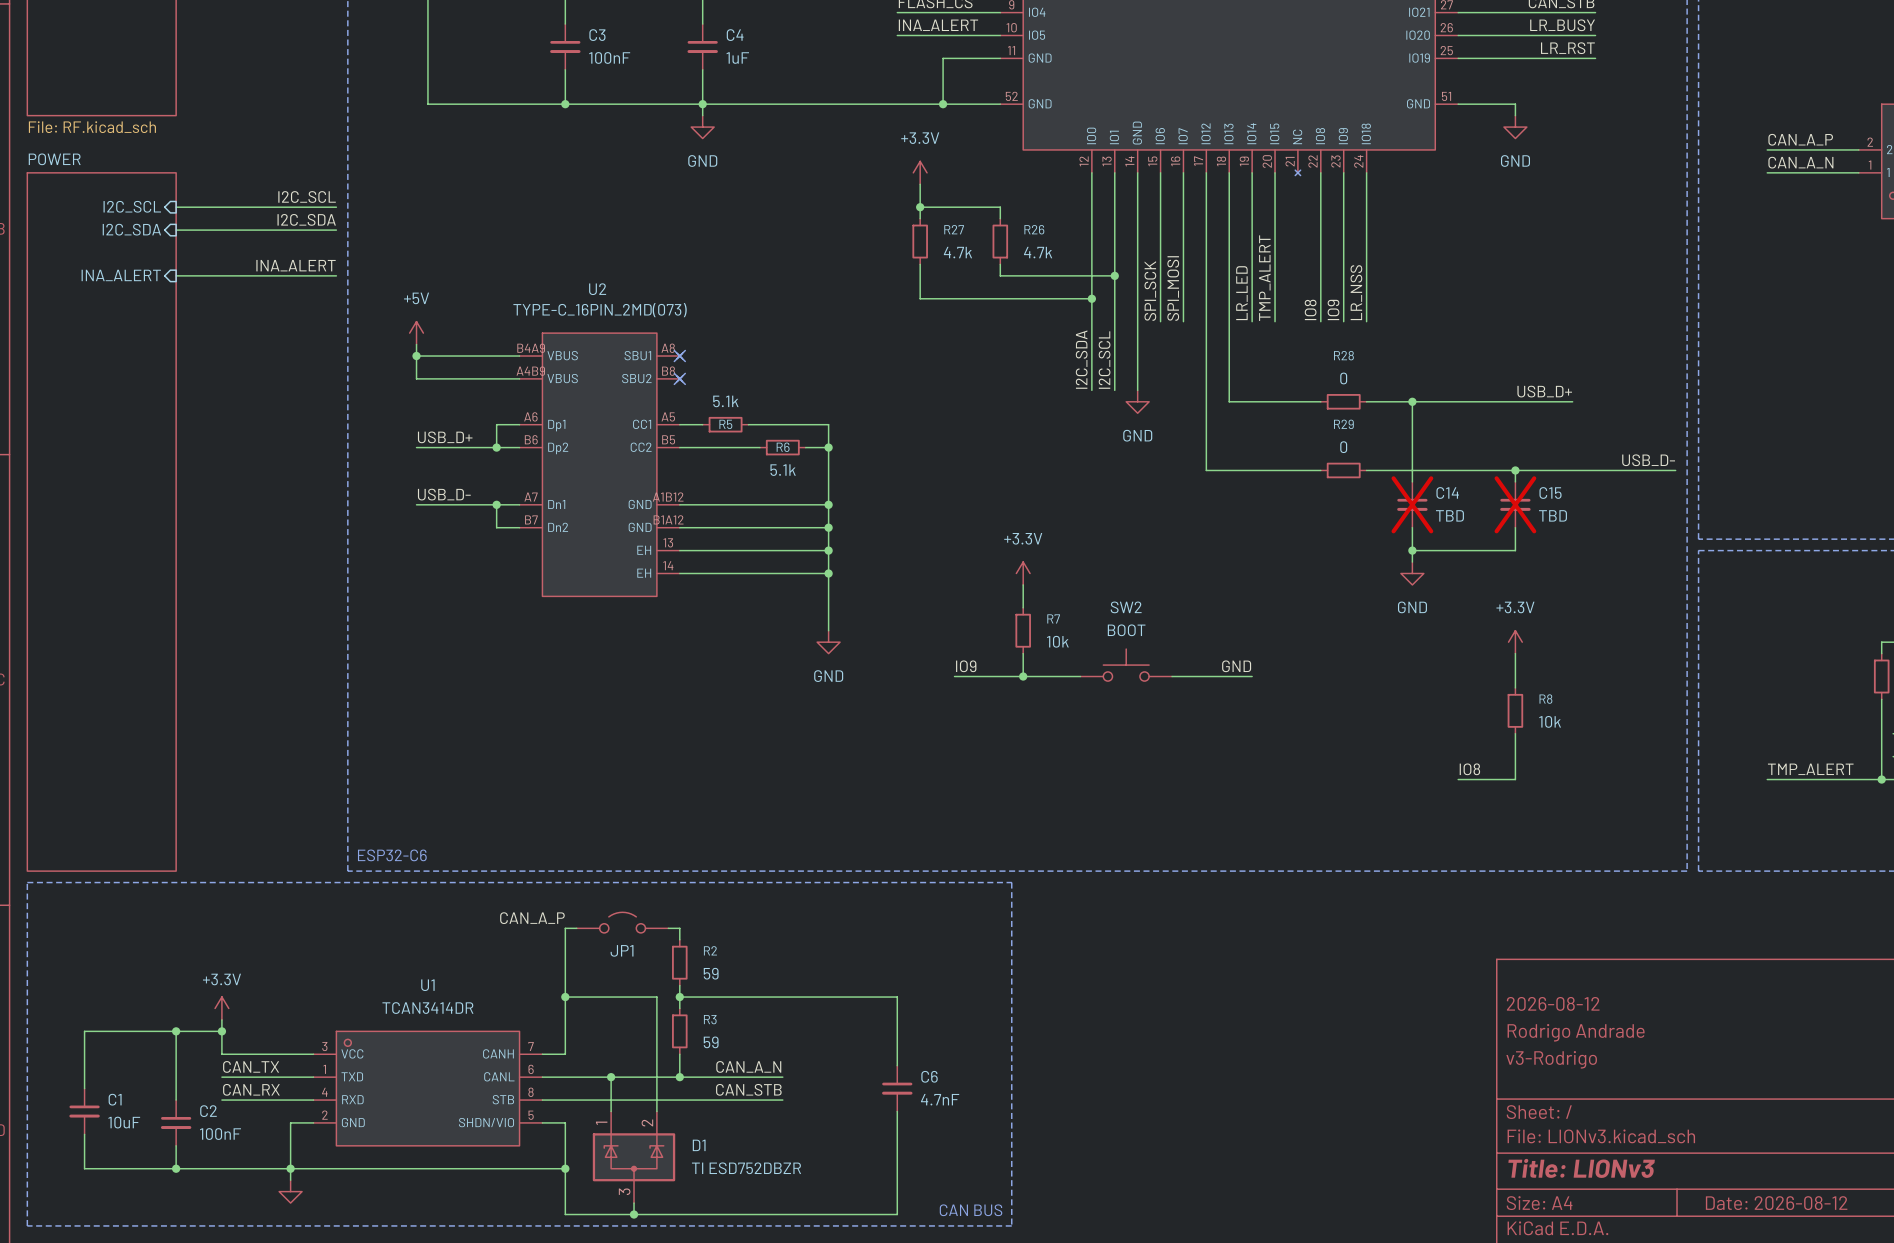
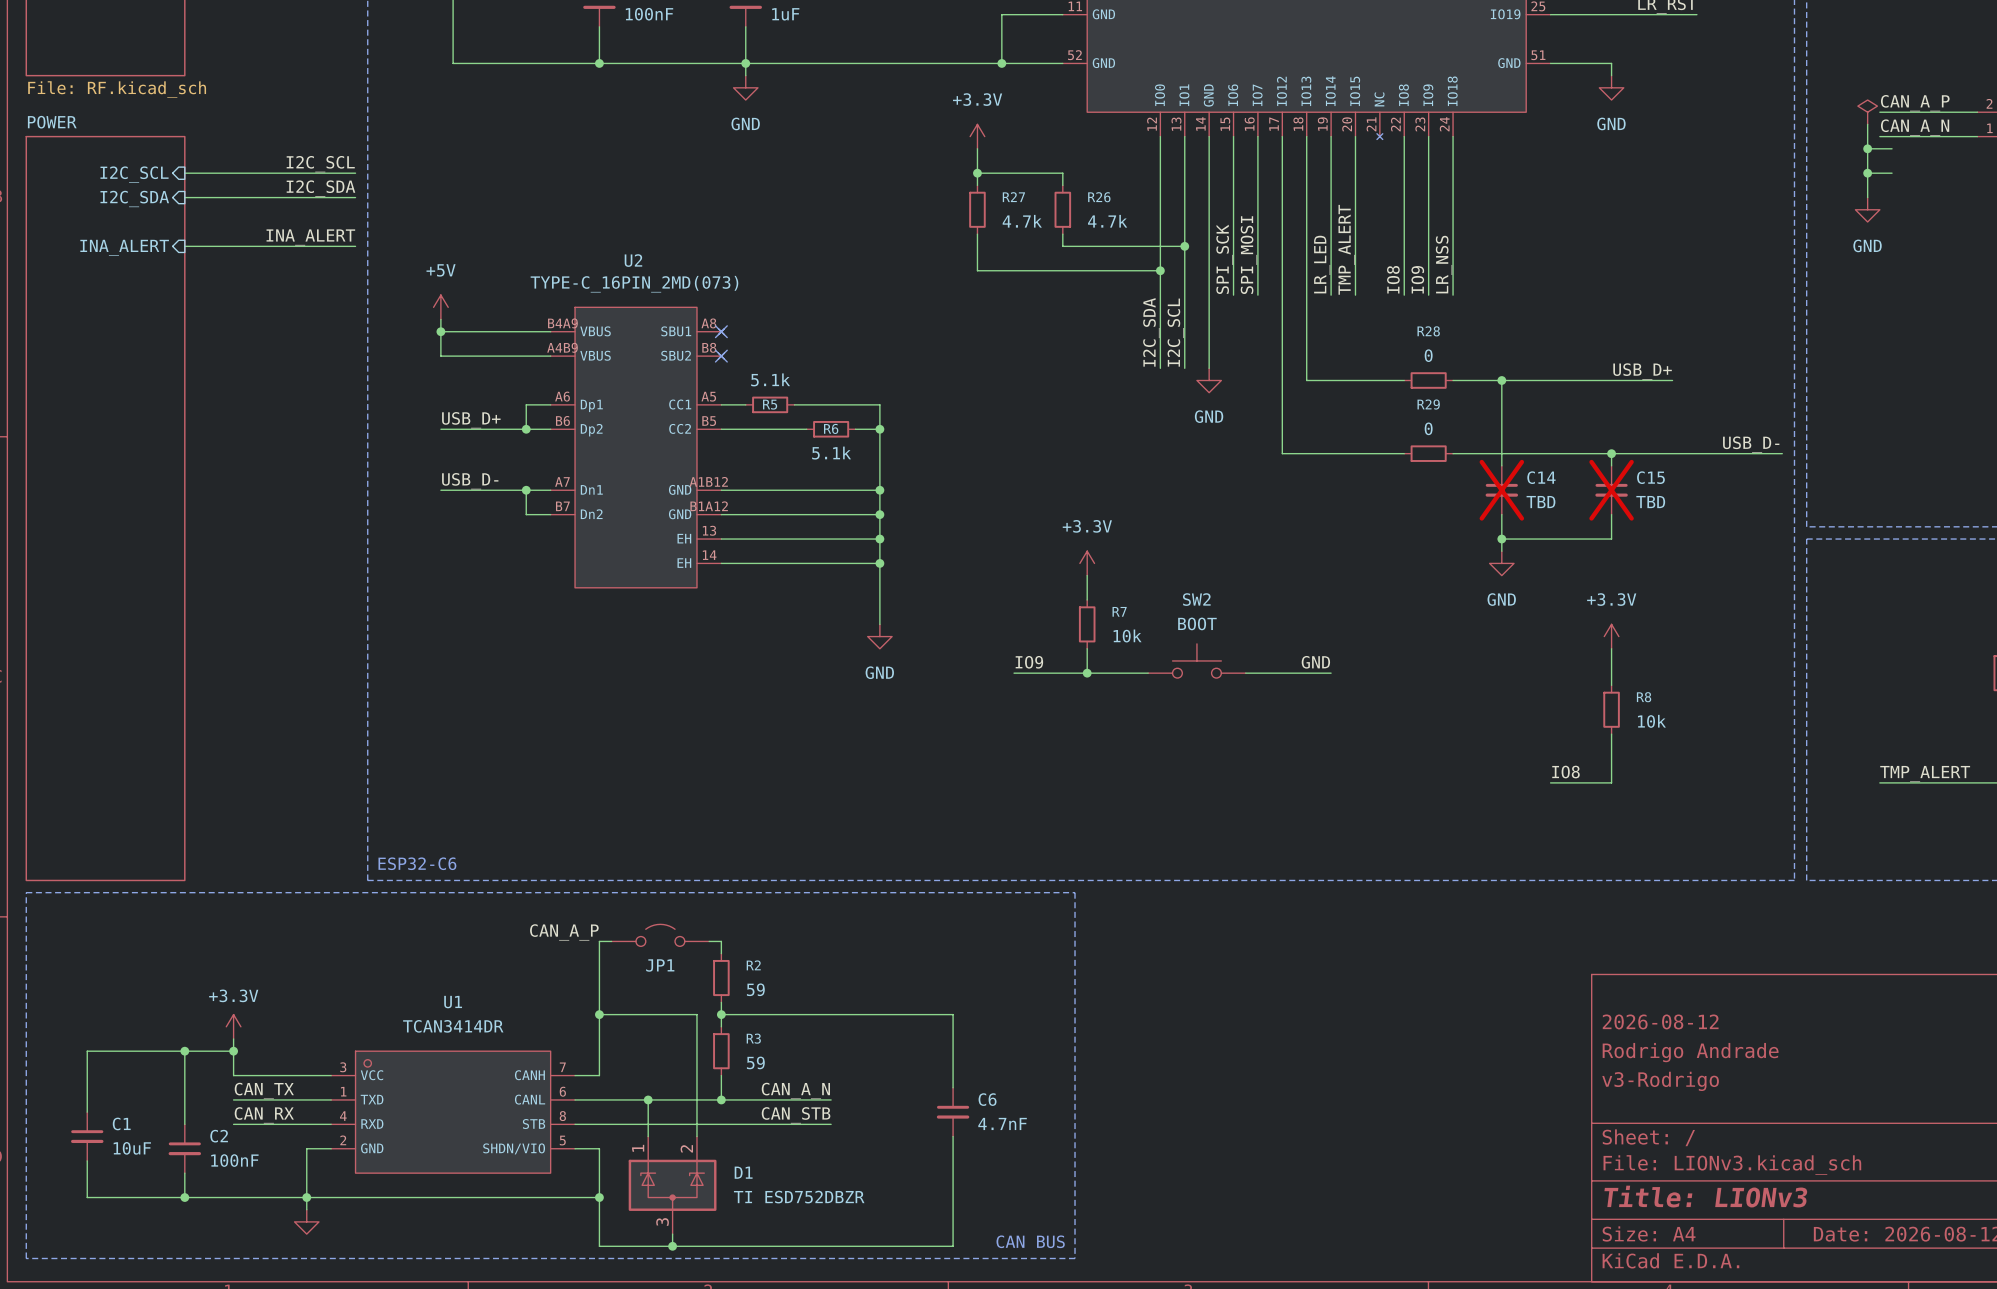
power symbol: none -> (1867, 112)
wire: none -> (1867, 124) (1867, 197)
wire: none -> (1867, 148) (1892, 148)
junction: none -> (1867, 148)
wire: none -> (1867, 173) (1892, 173)
junction: none -> (1867, 173)
power symbol: none -> GND (1867, 209)

